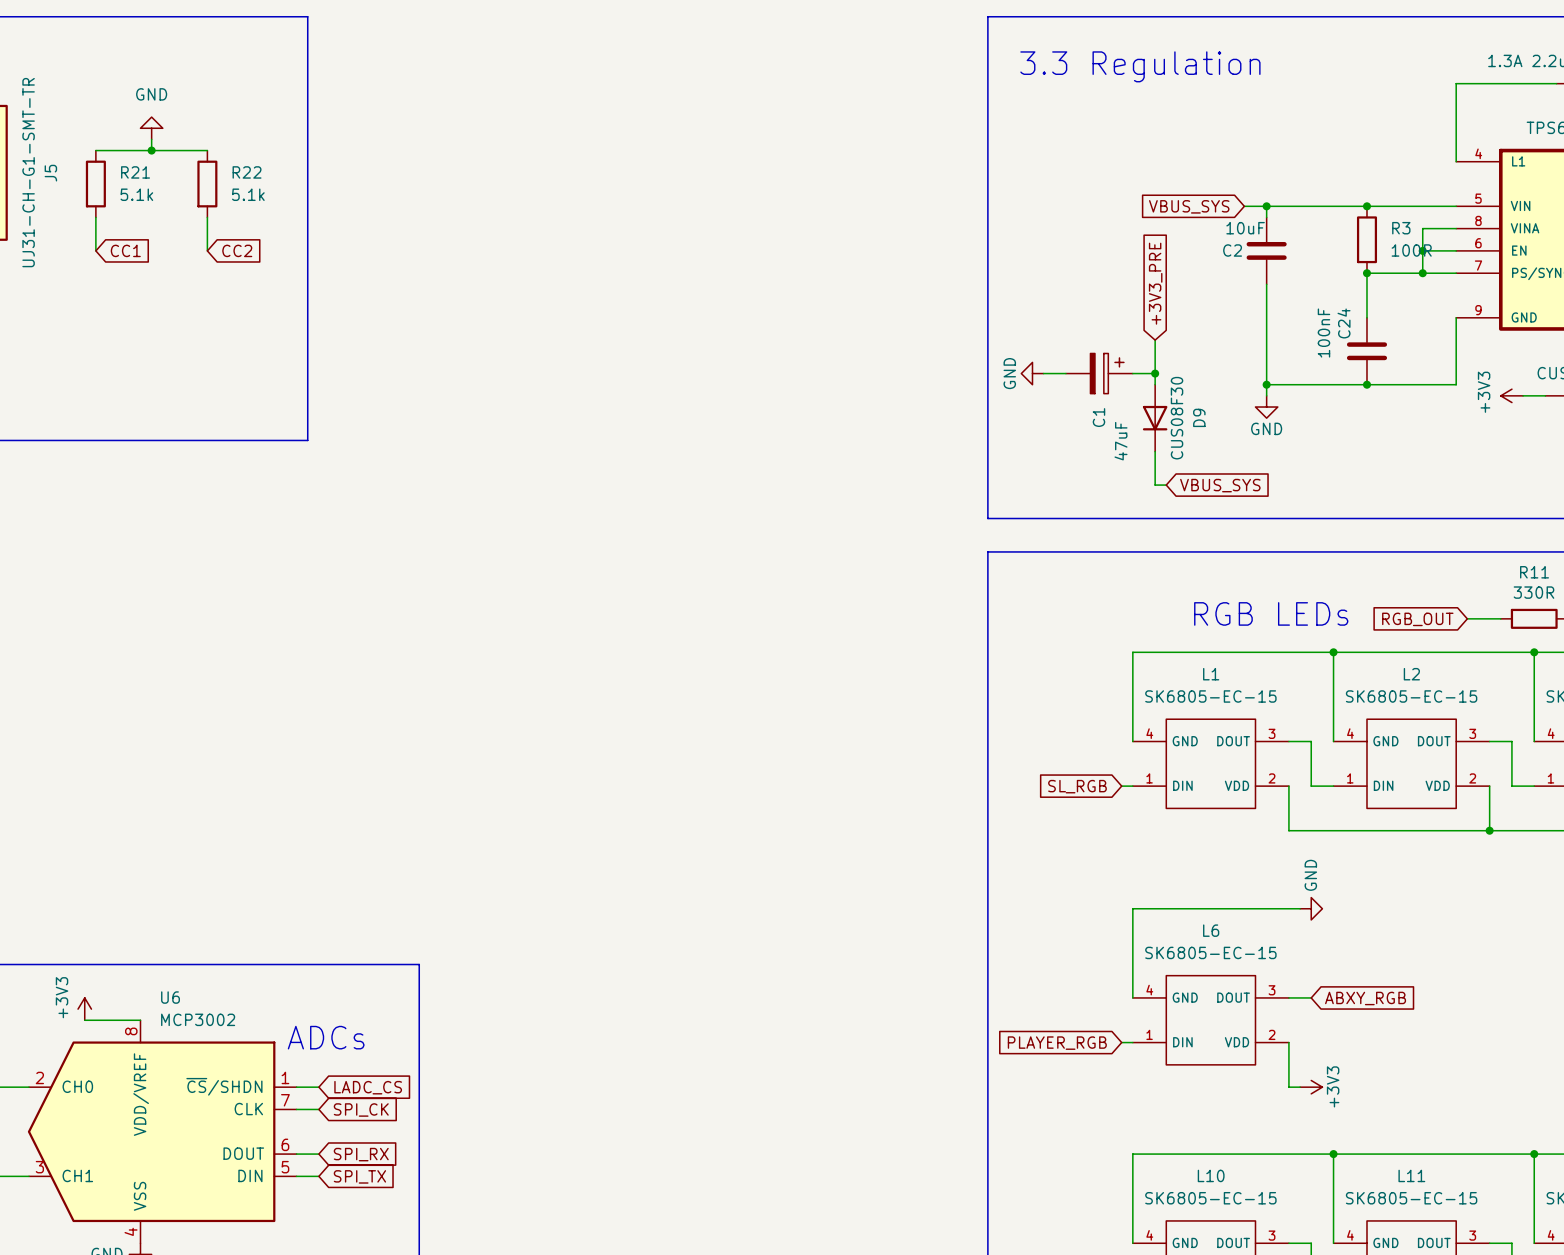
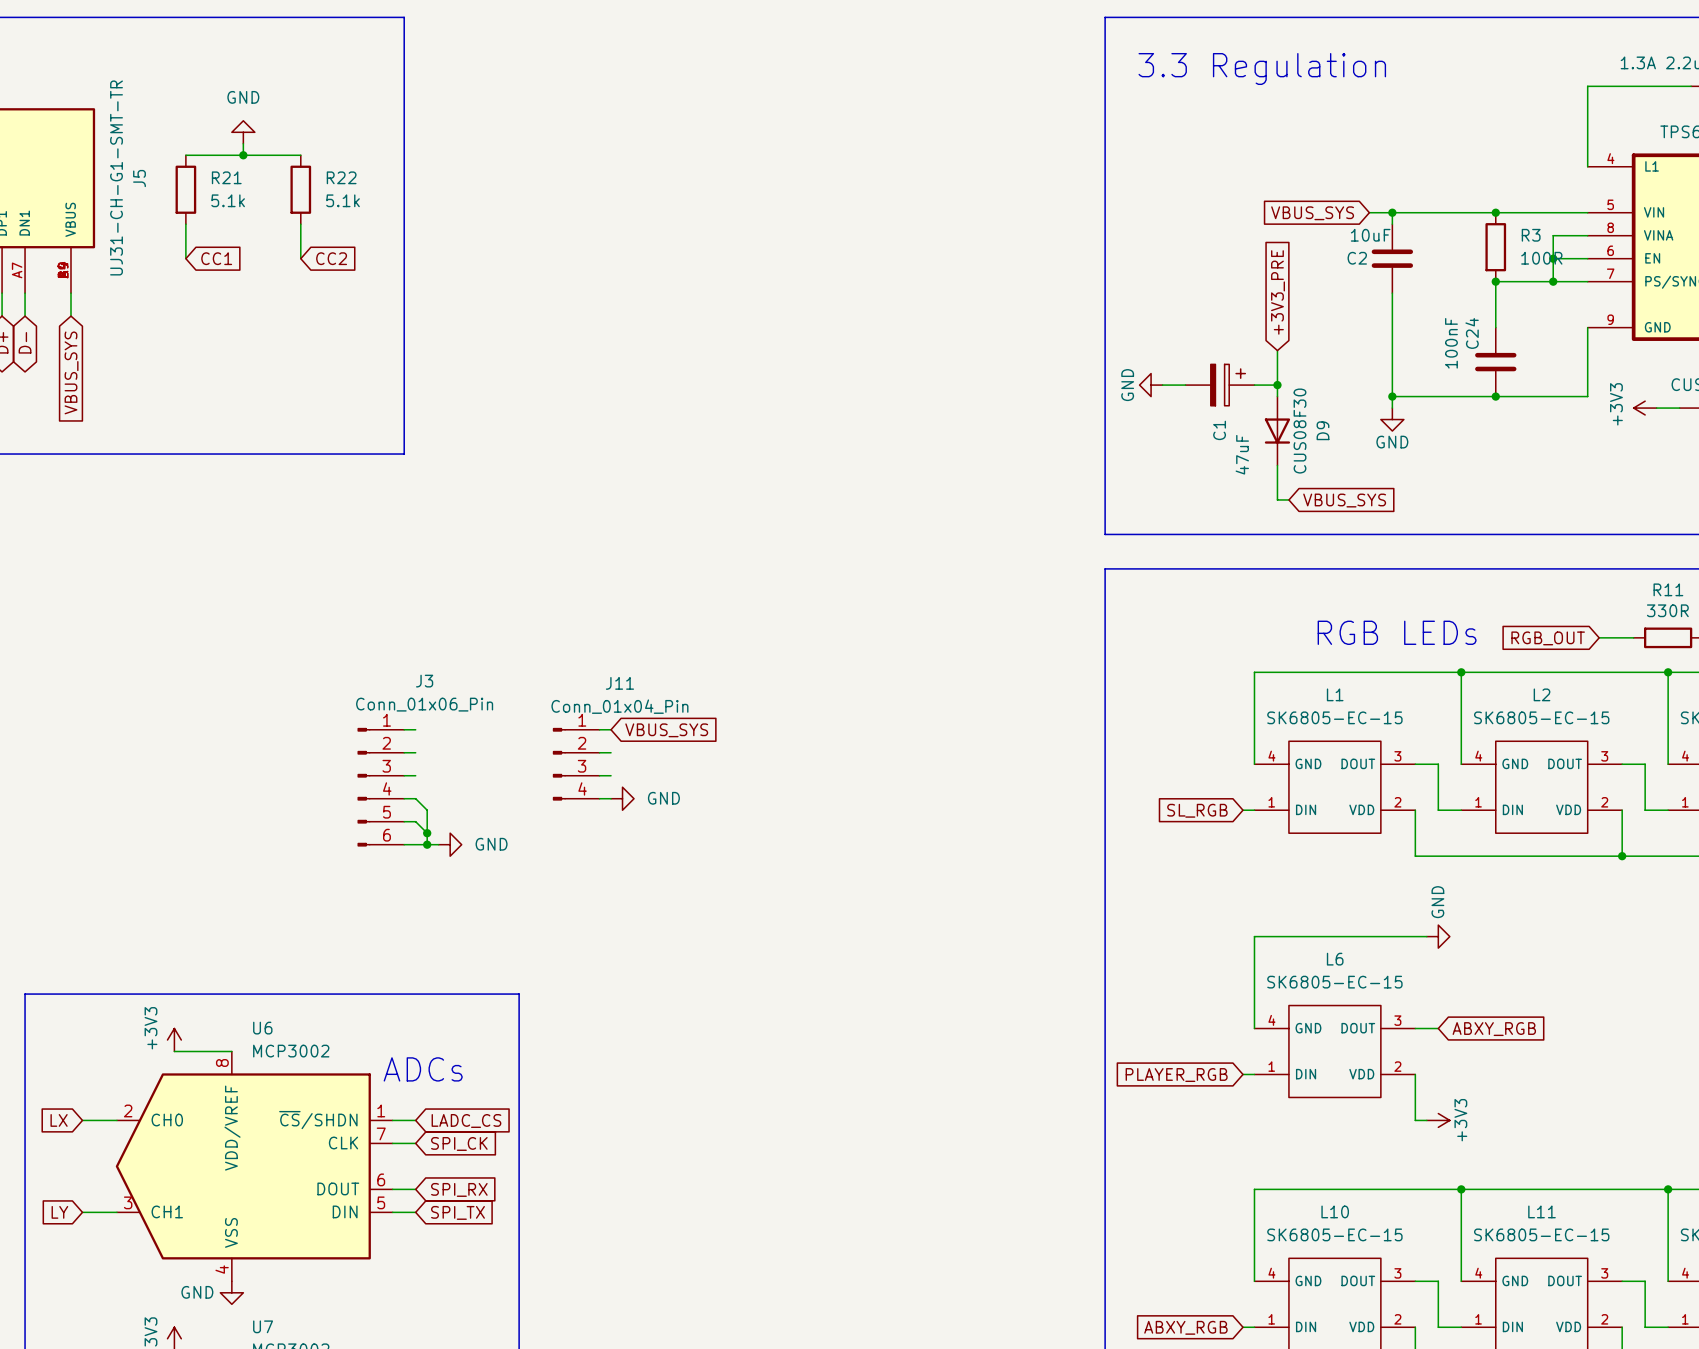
wire: none -> (404, 729) (415, 729)
wire: none -> (599, 729) (611, 729)
global label: none -> VBUS_SYS (666, 730)
wire: none -> (404, 752) (415, 752)
wire: none -> (599, 752) (611, 752)
J11: none -> Conn_01x04_Pin (576, 764)
wire: none -> (404, 775) (415, 775)
wire: none -> (599, 775) (611, 775)
J3: none -> Conn_01x06_Pin (380, 787)
wire: none -> (404, 798) (415, 798) (427, 810) (427, 844)
wire: none -> (599, 798) (611, 798)
power symbol: none -> GND (622, 798)
wire: none -> (404, 821) (415, 821) (427, 833)
junction: none -> (427, 833)
wire: none -> (404, 844) (438, 844)
junction: none -> (427, 844)
power symbol: none -> GND (450, 844)

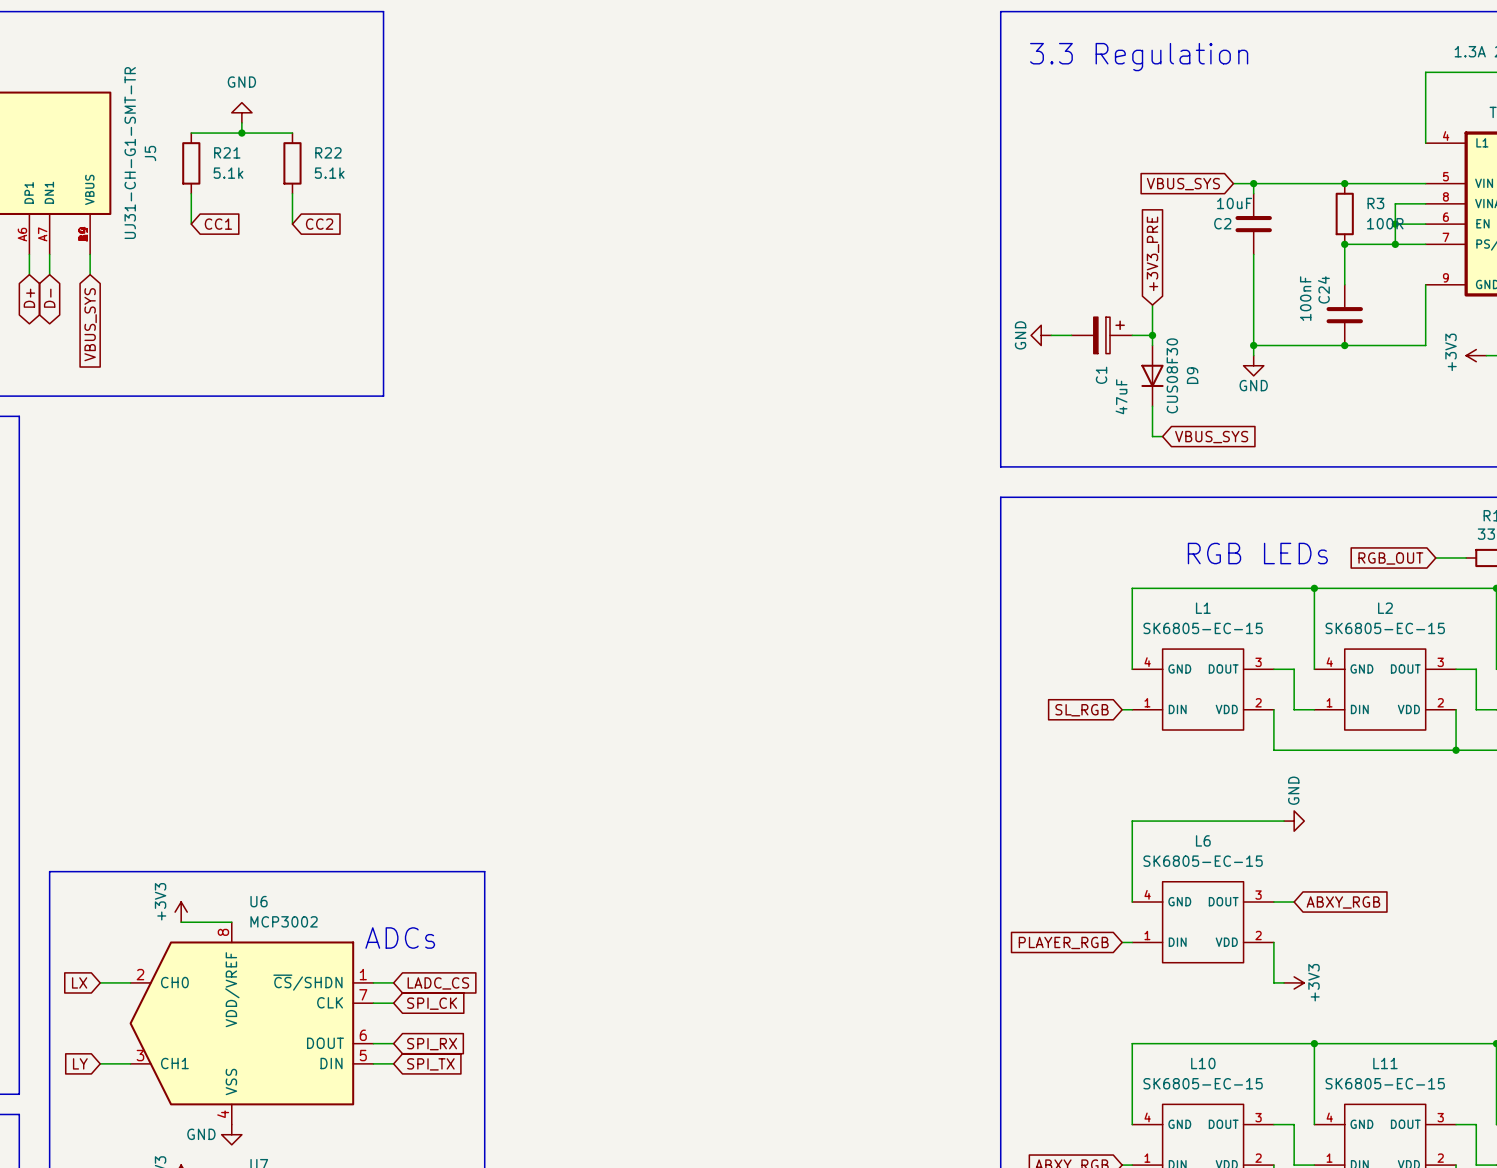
wire: (404, 729) (415, 729) -> none
wire: (599, 729) (611, 729) -> none
global label: VBUS_SYS (666, 730) -> none
wire: (404, 752) (415, 752) -> none
wire: (599, 752) (611, 752) -> none
J11: Conn_01x04_Pin (576, 764) -> none
wire: (404, 775) (415, 775) -> none
wire: (599, 775) (611, 775) -> none
J3: Conn_01x06_Pin (380, 787) -> none
wire: (404, 798) (415, 798) (427, 810) (427, 844) -> none
wire: (599, 798) (611, 798) -> none
power symbol: GND (622, 798) -> none
wire: (404, 821) (415, 821) (427, 833) -> none
junction: (427, 833) -> none
wire: (404, 844) (438, 844) -> none
junction: (427, 844) -> none
power symbol: GND (450, 844) -> none

